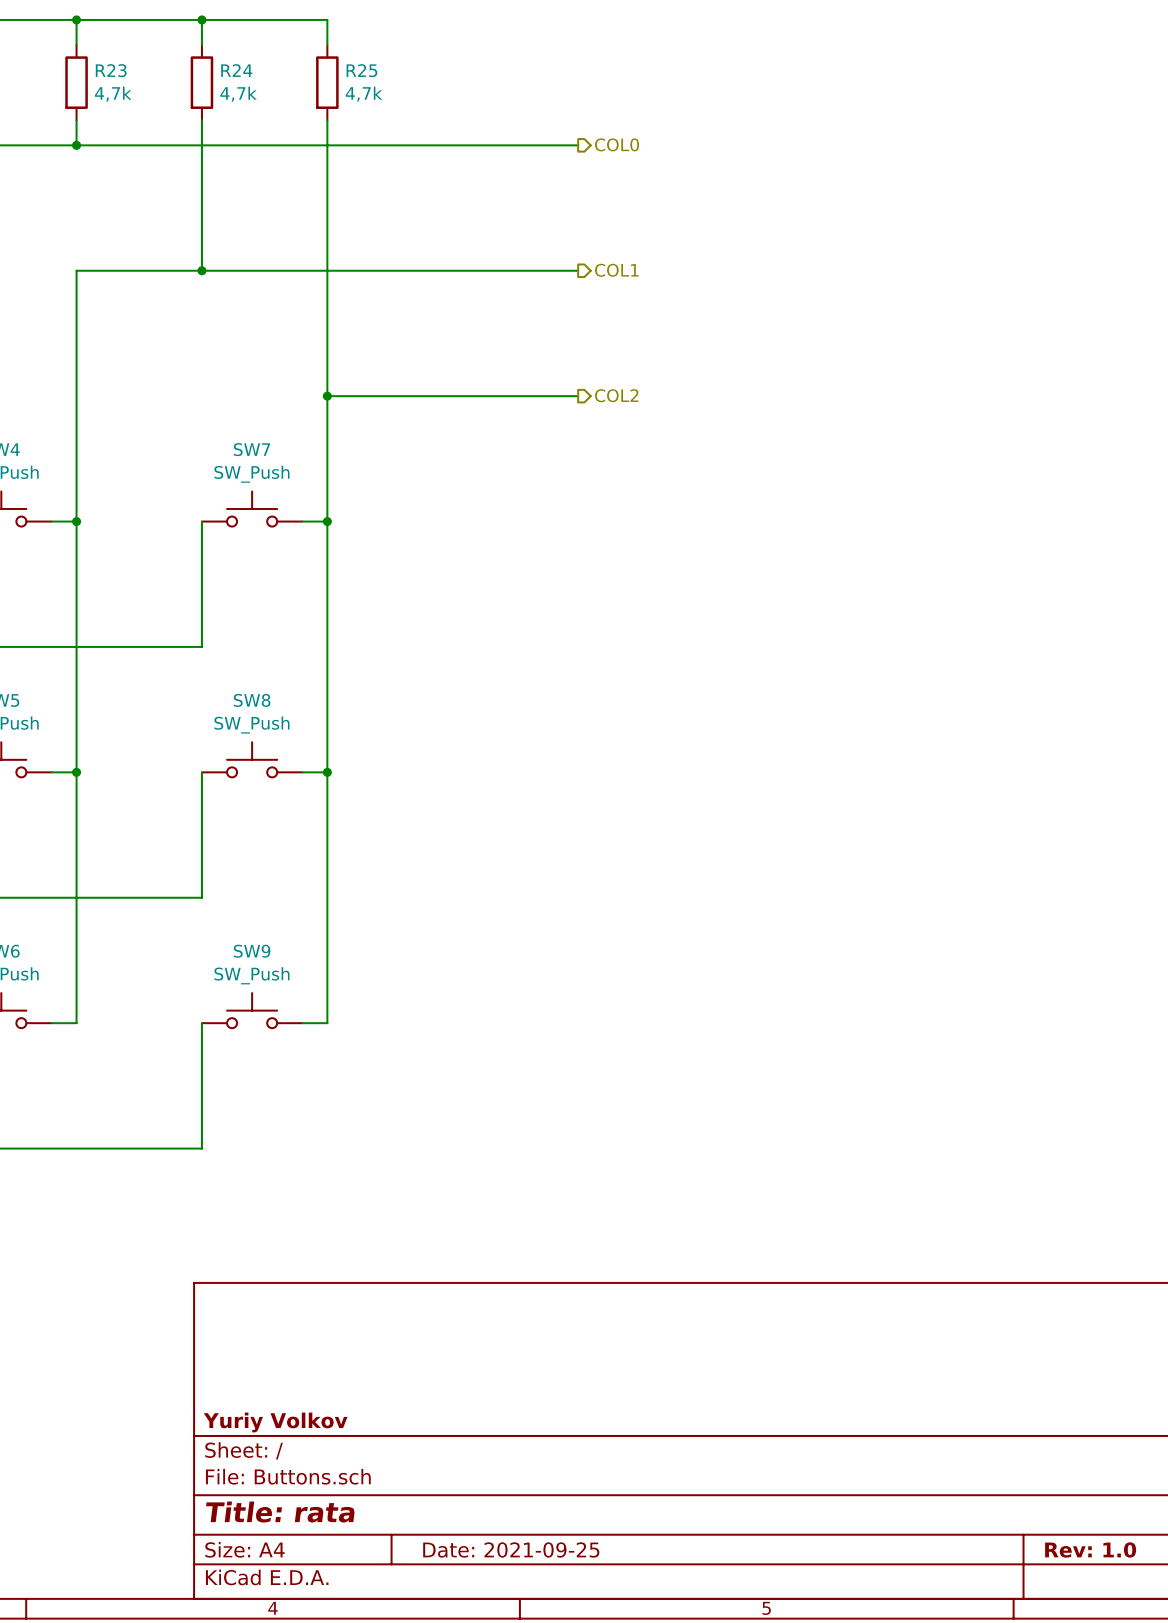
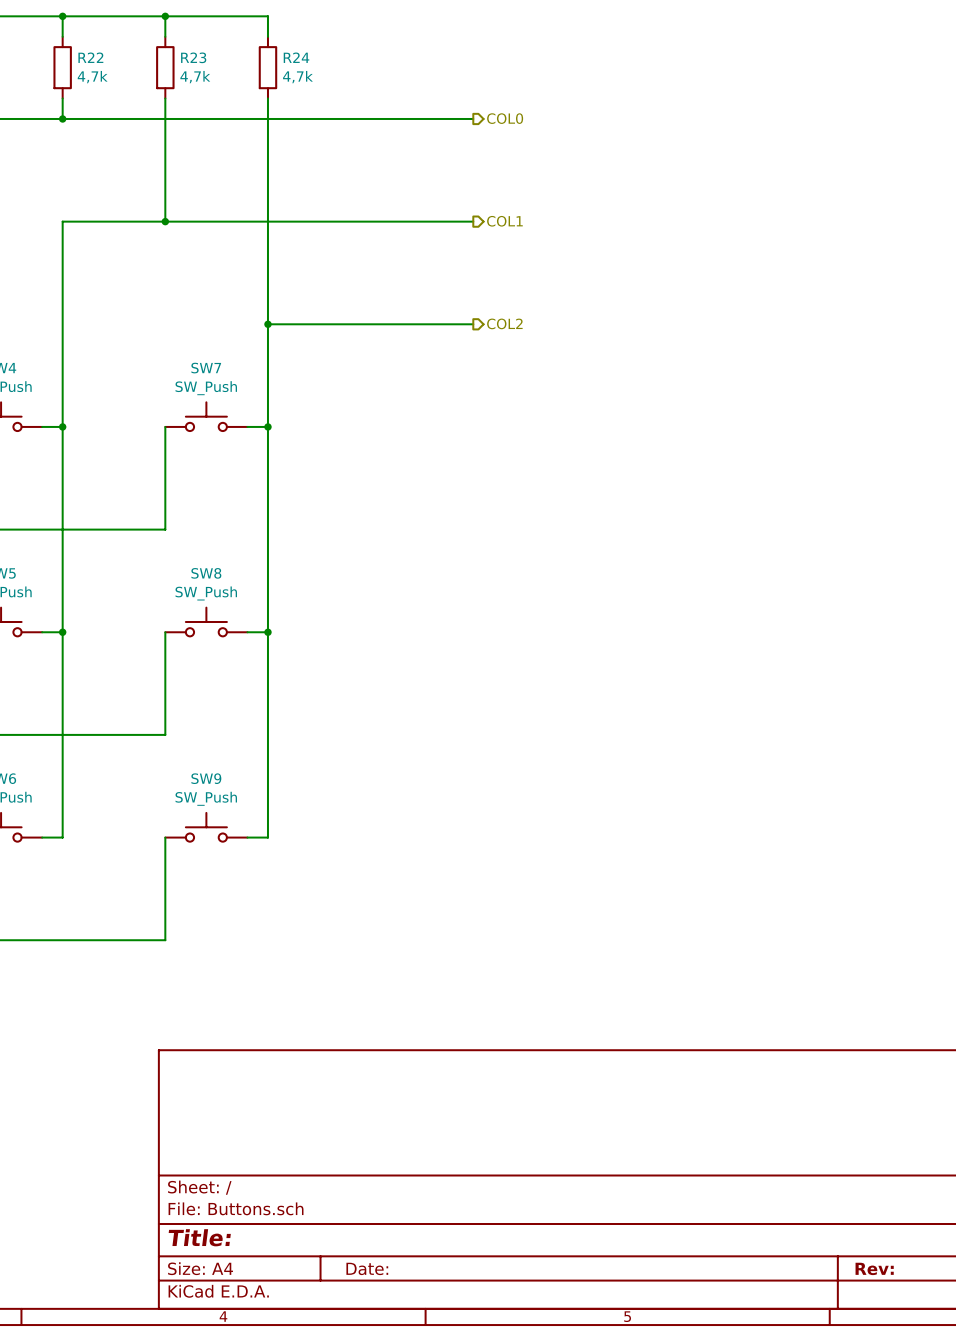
R23 name: R23 (111, 70) -> R22 (90, 57)
R24 name: R24 (236, 70) -> R23 (193, 57)
R25 name: R25 (361, 70) -> R24 (296, 57)
title block: Yuriy Volkov (275, 1422) -> none
title block: Title: rata (280, 1512) -> Title: (199, 1237)
title block: Date: 2021-09-25 (511, 1549) -> Date: (367, 1268)
title block: Rev: 1.0 (1090, 1549) -> Rev: (874, 1268)

